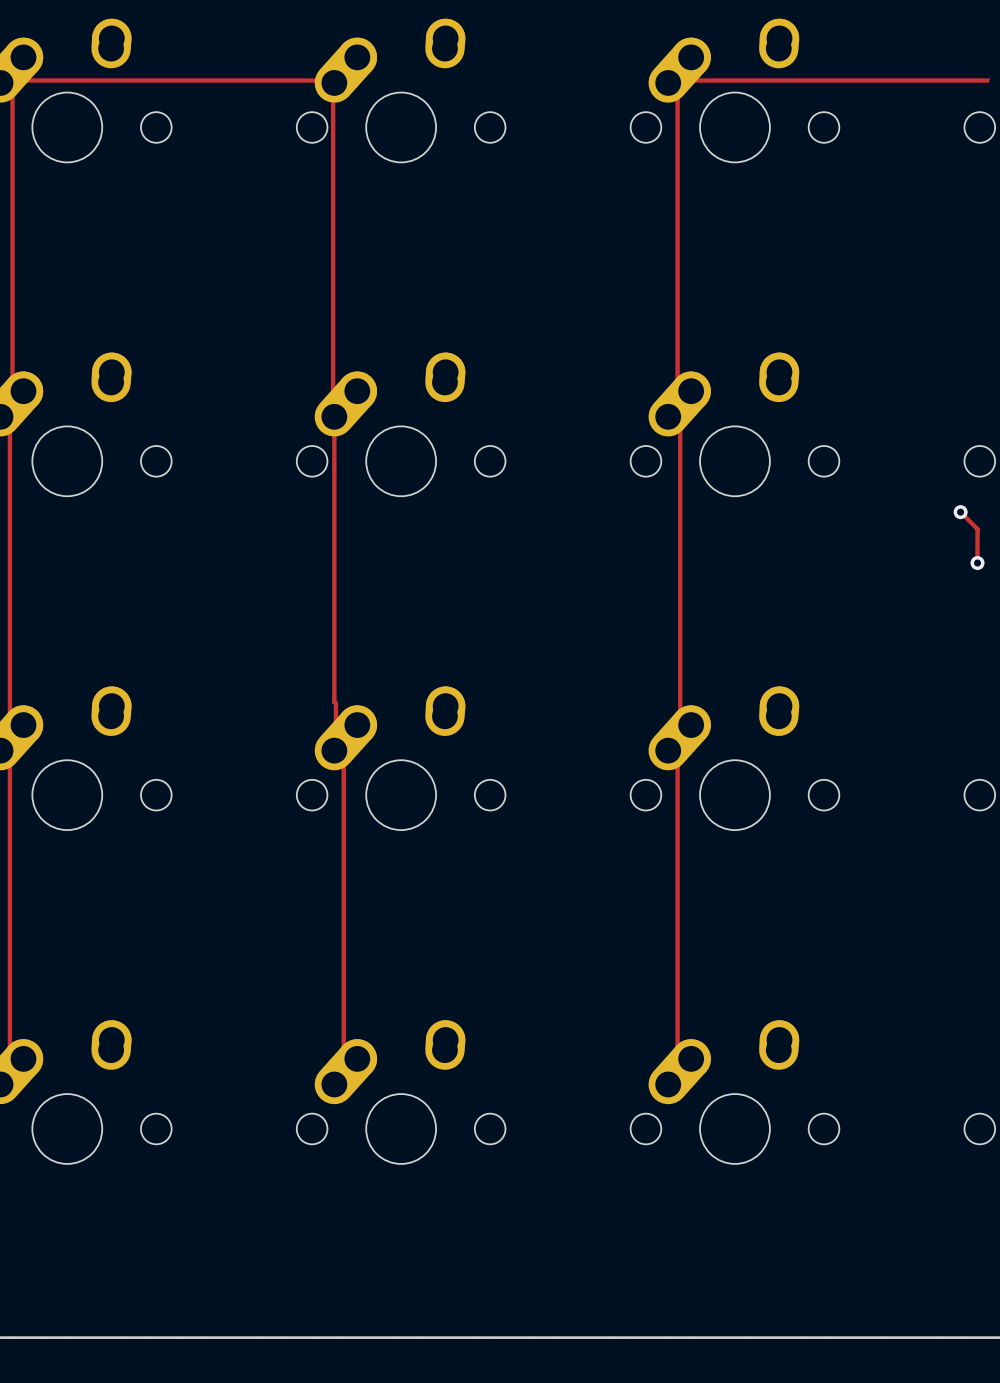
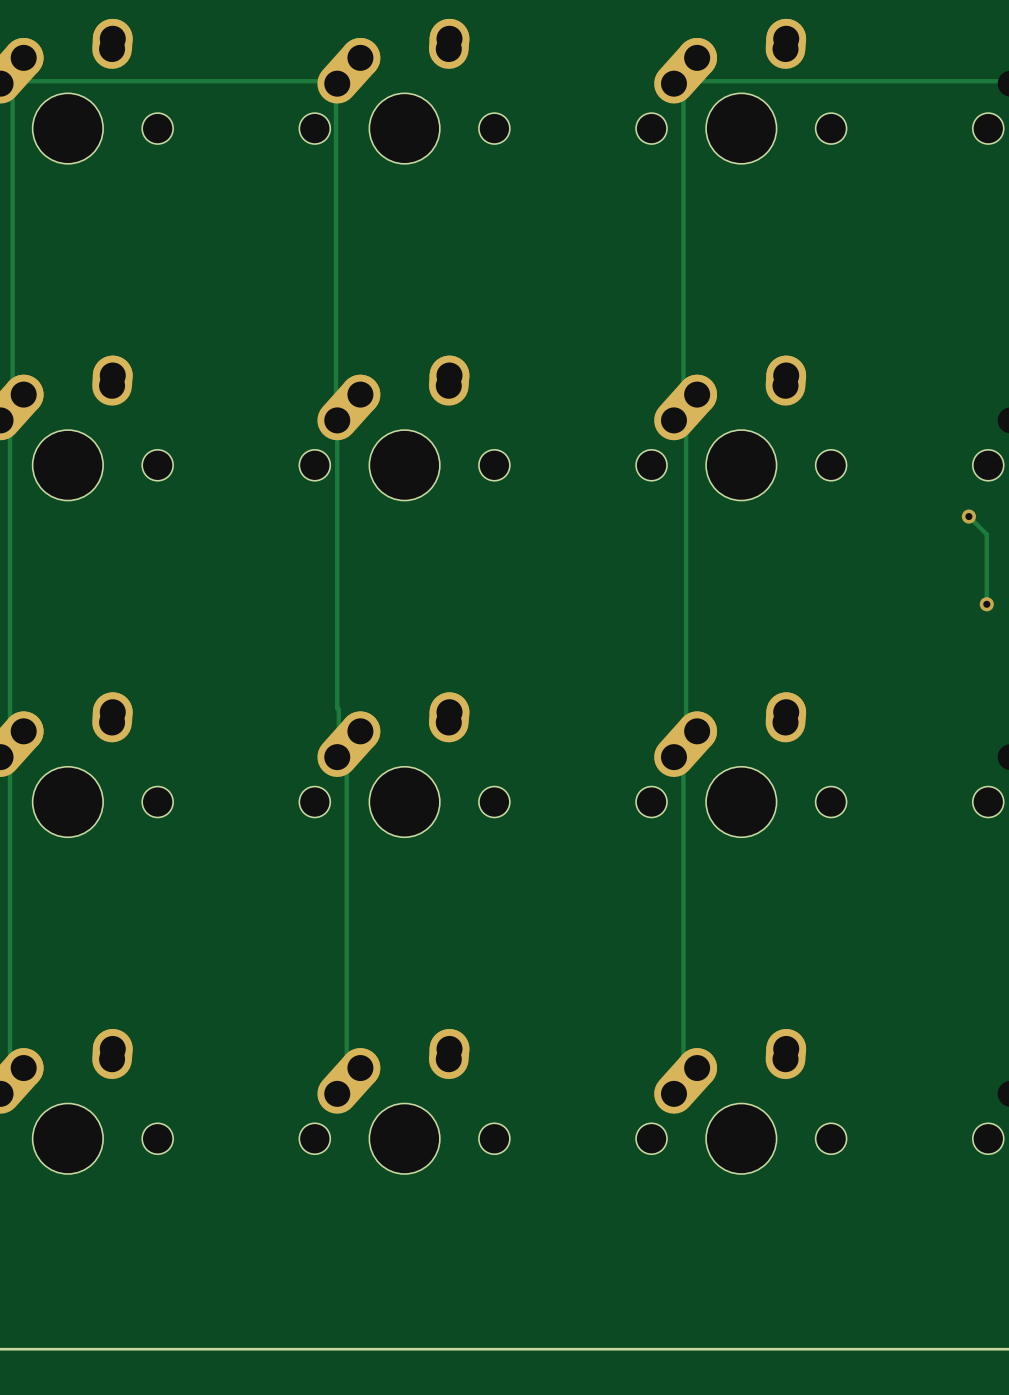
track: (977, 529) (977, 563) -> (985, 533) (986, 604)
via position: (977, 563) -> (986, 604)

